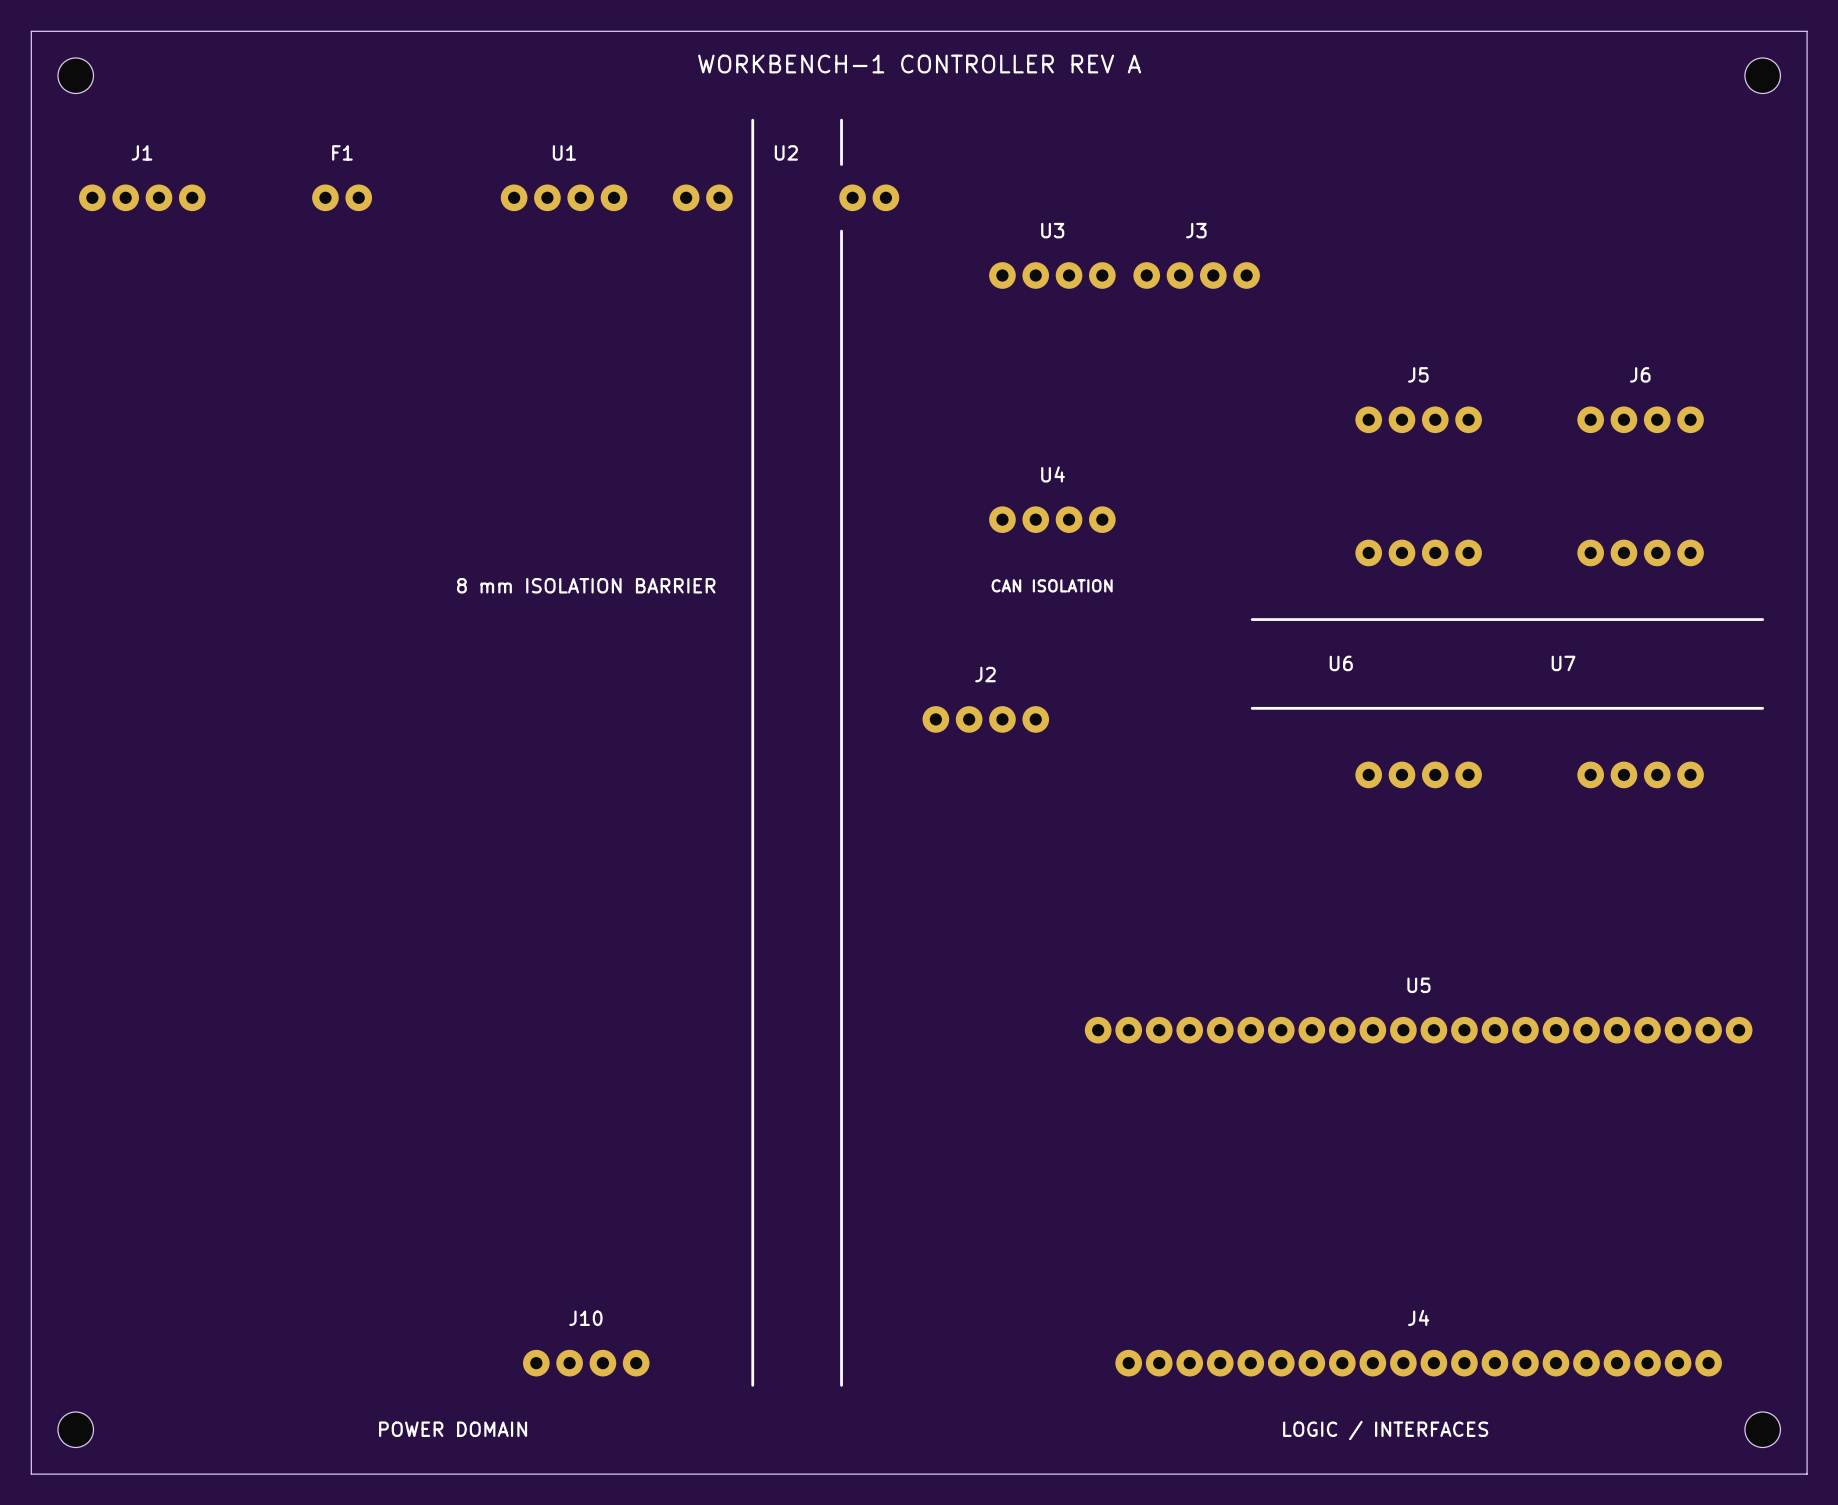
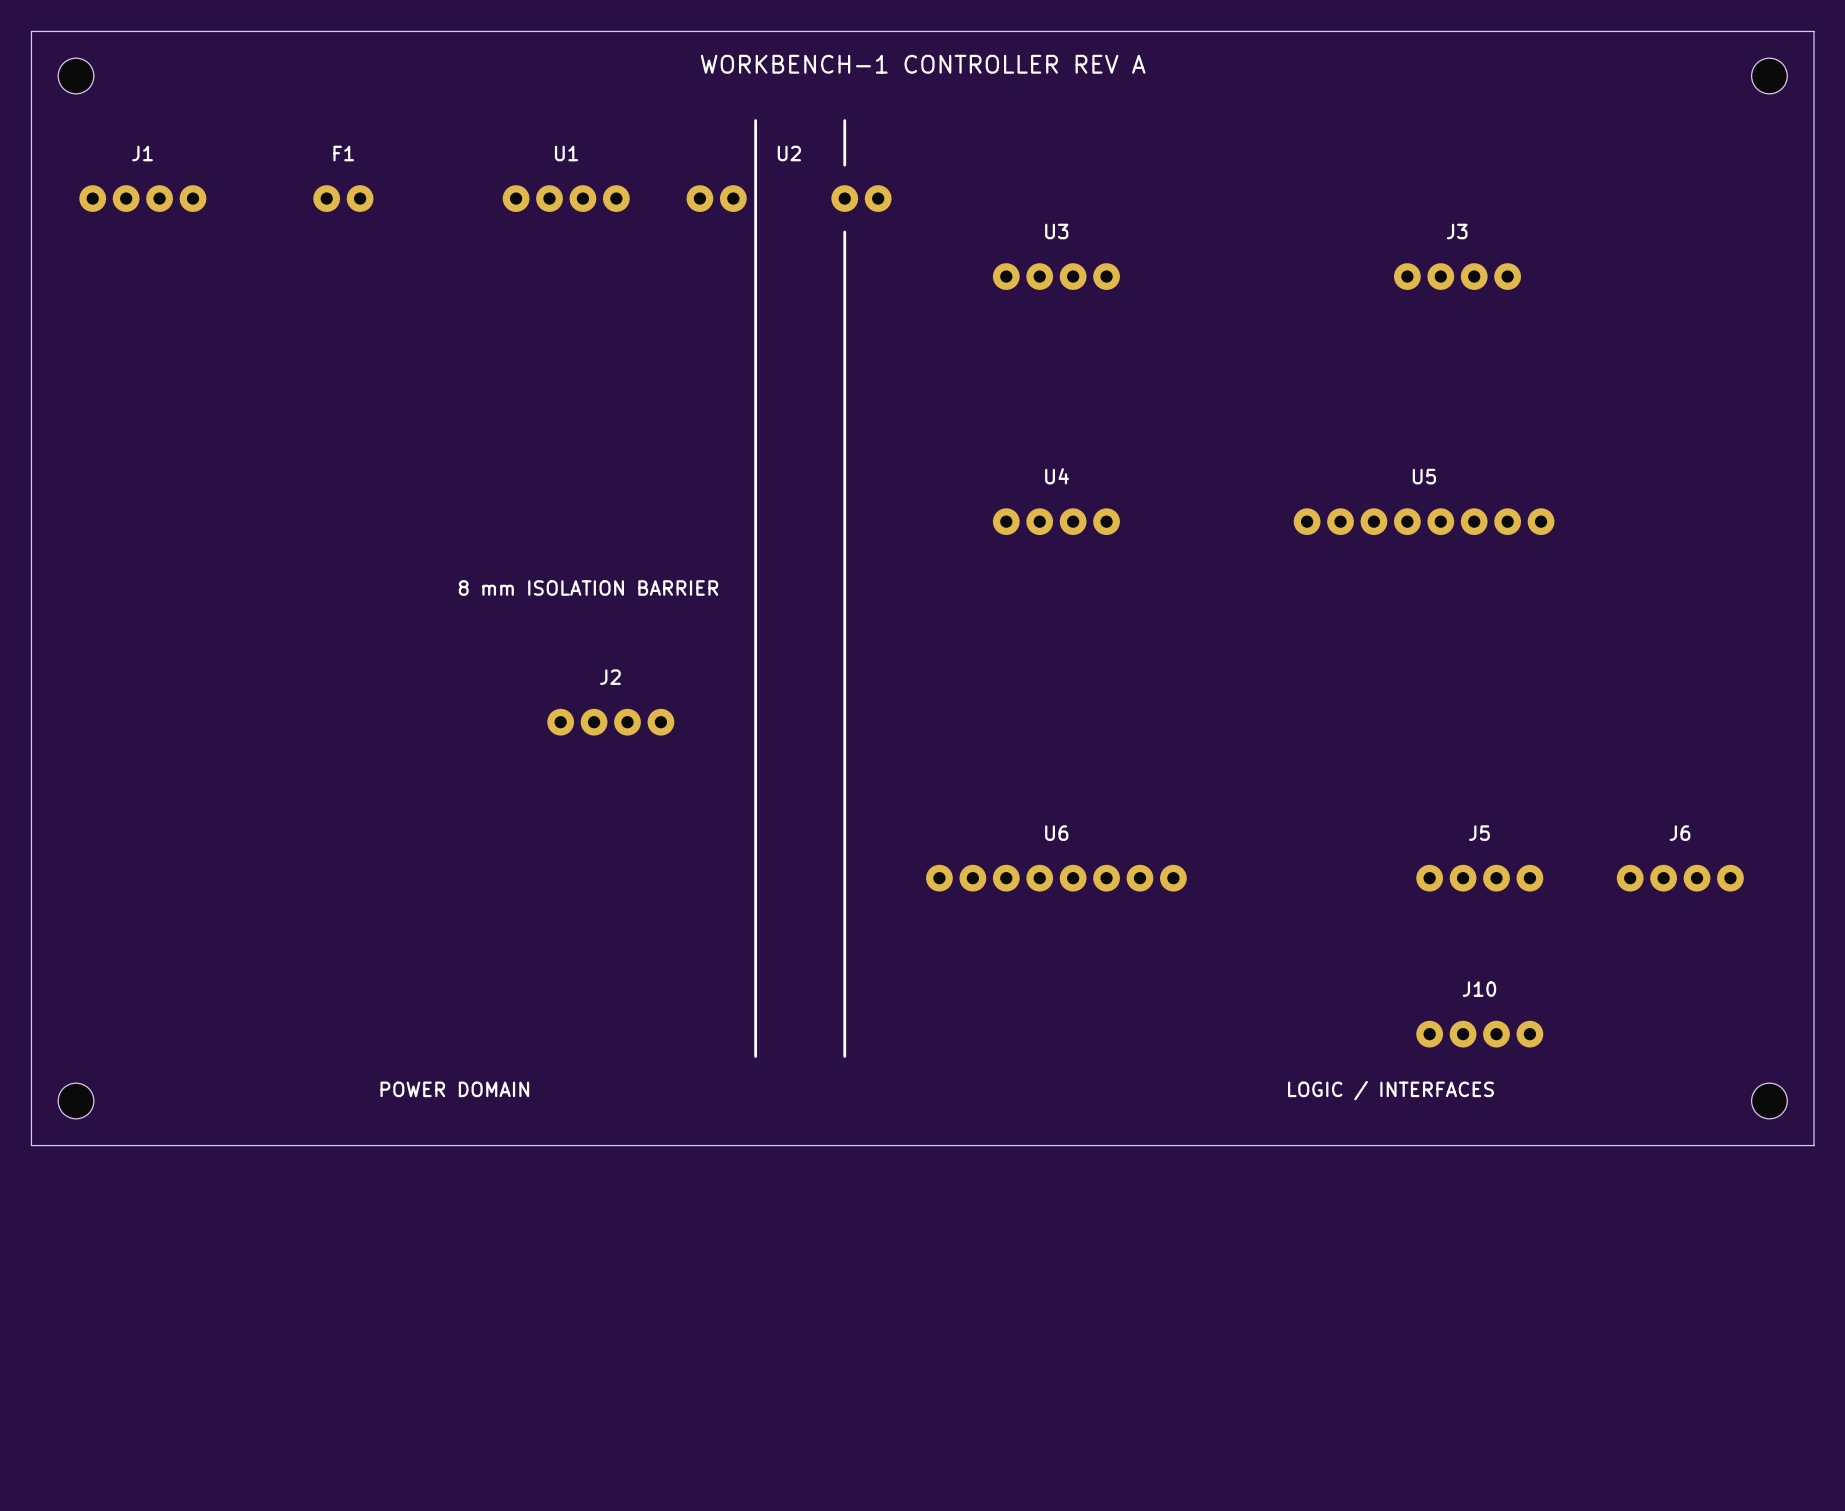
U2 footprint: [672, 184, 900, 212] -> [686, 185, 892, 212]
J3 position: (1196, 275) -> (1457, 276)
J5 position: (1418, 419) -> (1479, 878)
J6 position: (1640, 419) -> (1680, 878)
U6 footprint: [1355, 539, 1482, 789] -> [926, 864, 1187, 892]
text: CAN ISOLATION (1052, 585) -> none
line: (1252, 619) (1762, 619) -> none
U6 name position: U6 (1341, 663) -> U6 (1056, 833)
U7: (1640, 663) -> none
line: (1252, 708) (1762, 708) -> none
J2 position: (985, 719) -> (610, 722)
U5 footprint: [1084, 1016, 1753, 1044] -> [1293, 508, 1555, 536]
line: (752, 1052) (752, 1385) -> none
line: (841, 1052) (841, 1385) -> none
text: none -> POWER DOMAIN (454, 1089)
text: none -> LOGIC / INTERFACES (1390, 1090)
part: none -> (76, 1100)
part: none -> (1769, 1100)
board edge: (31, 1141) (31, 1474) (1807, 1474) (1807, 1141) -> (31, 1145) (1814, 1145)
J10 position: (586, 1363) -> (1479, 1034)
J4: (1418, 1363) -> none
part: (75, 1429) -> none
text: POWER DOMAIN (453, 1429) -> none
part: (1762, 1429) -> none
text: LOGIC / INTERFACES (1385, 1430) -> none

